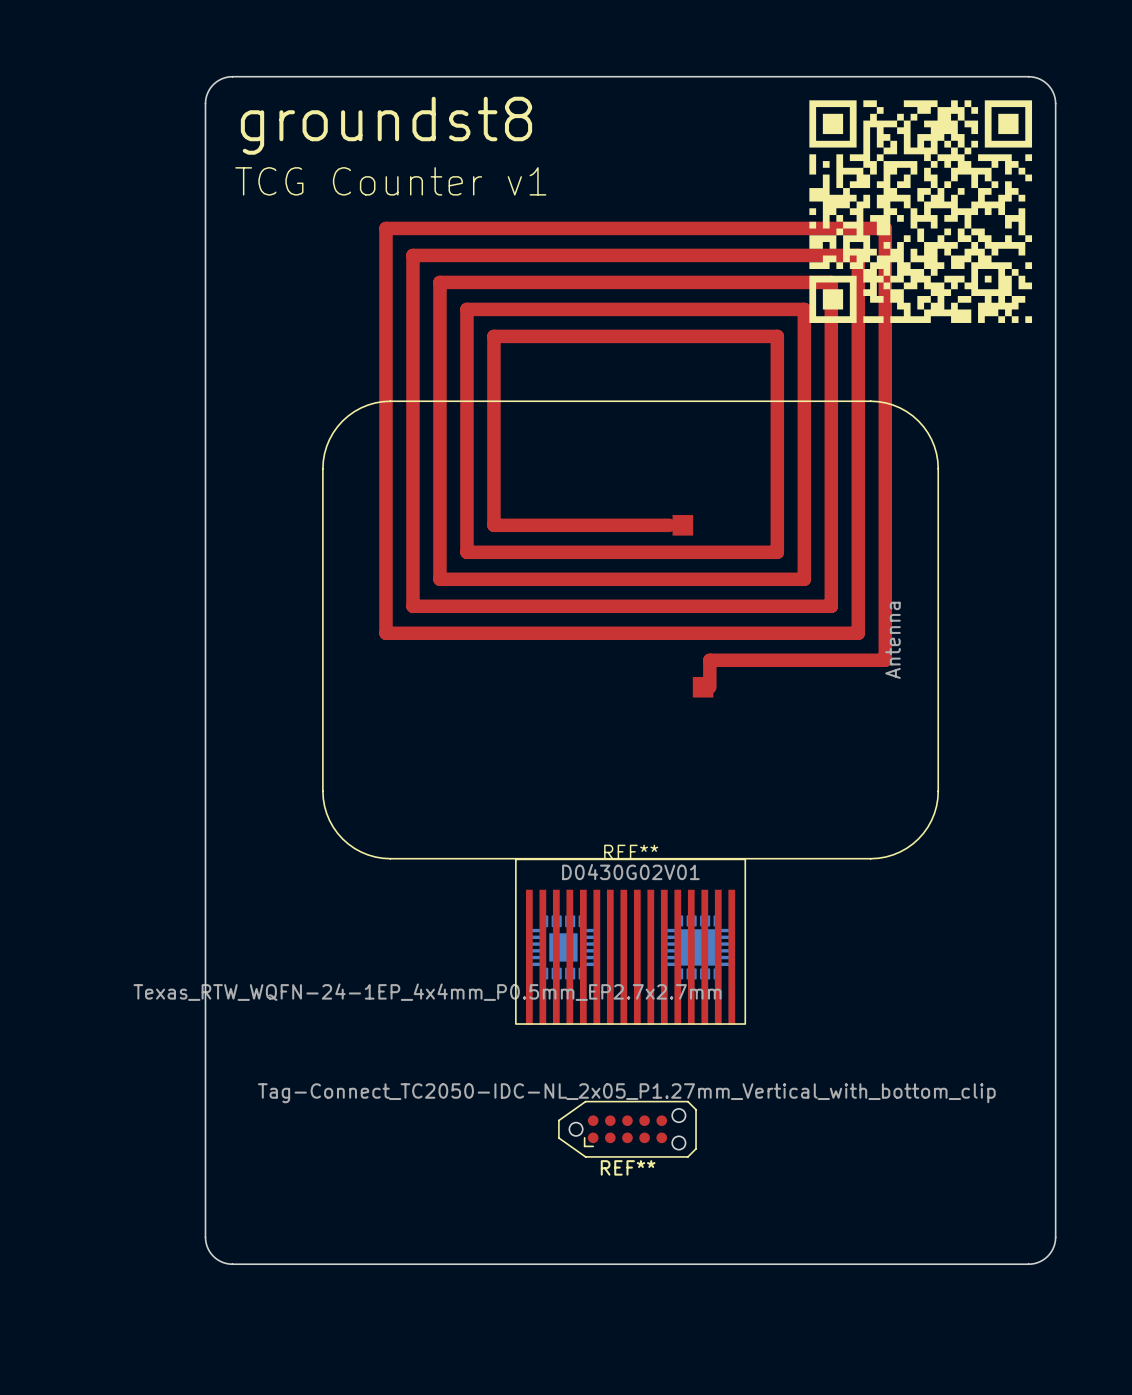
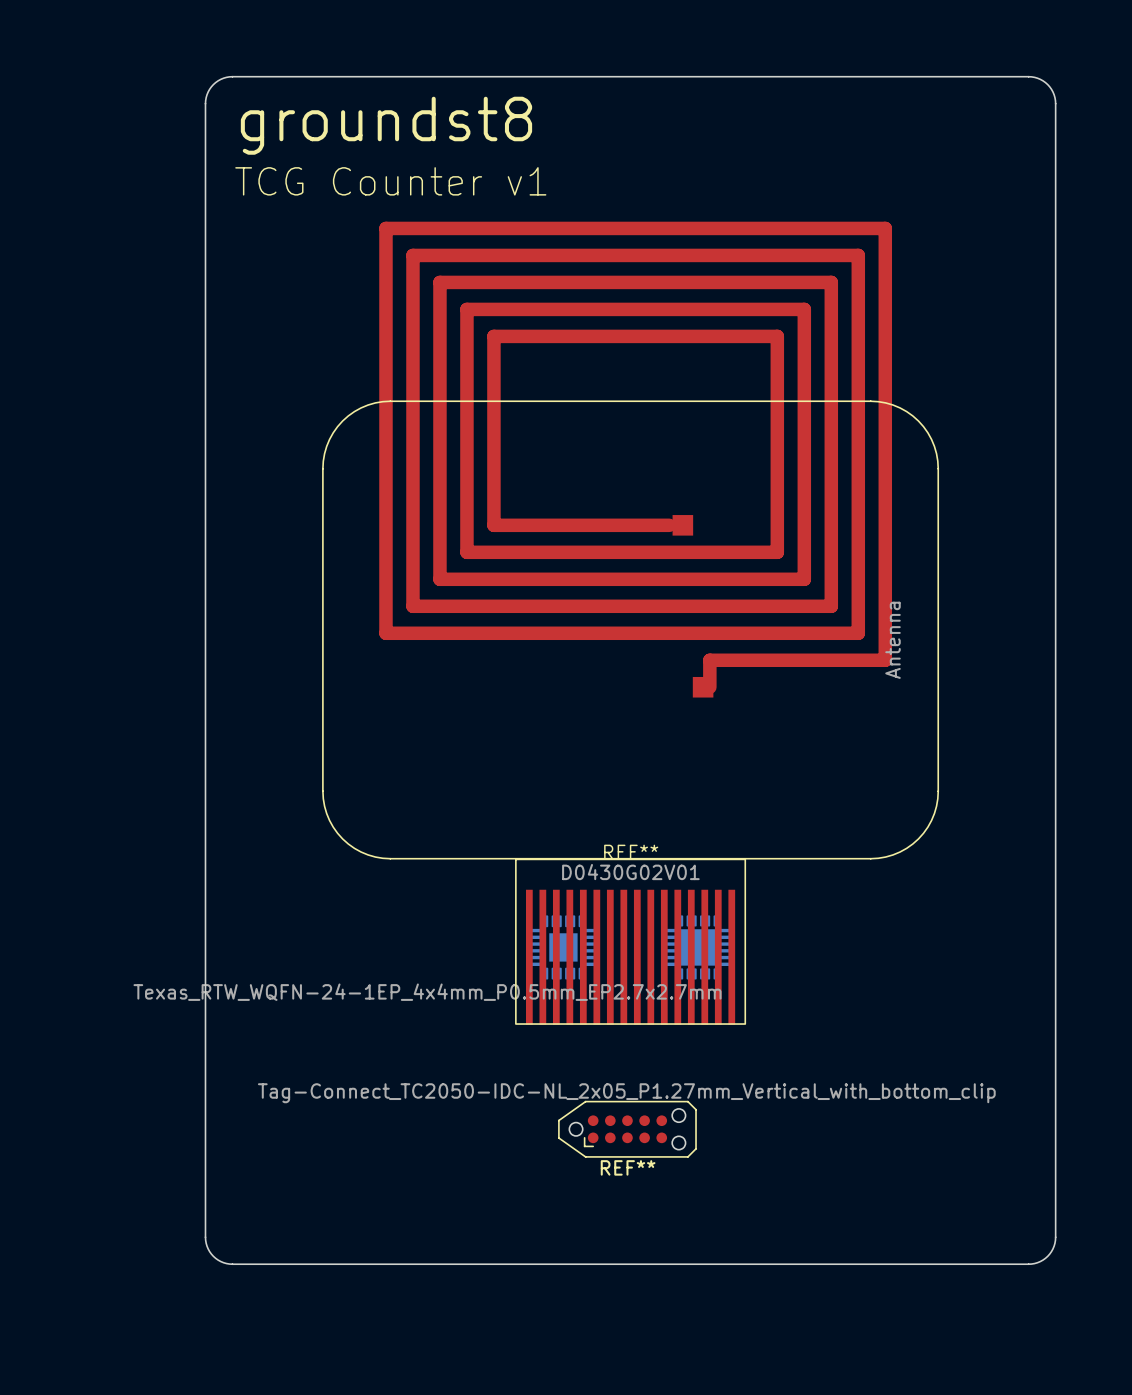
drawing: [809, 100, 1033, 323] -> none

